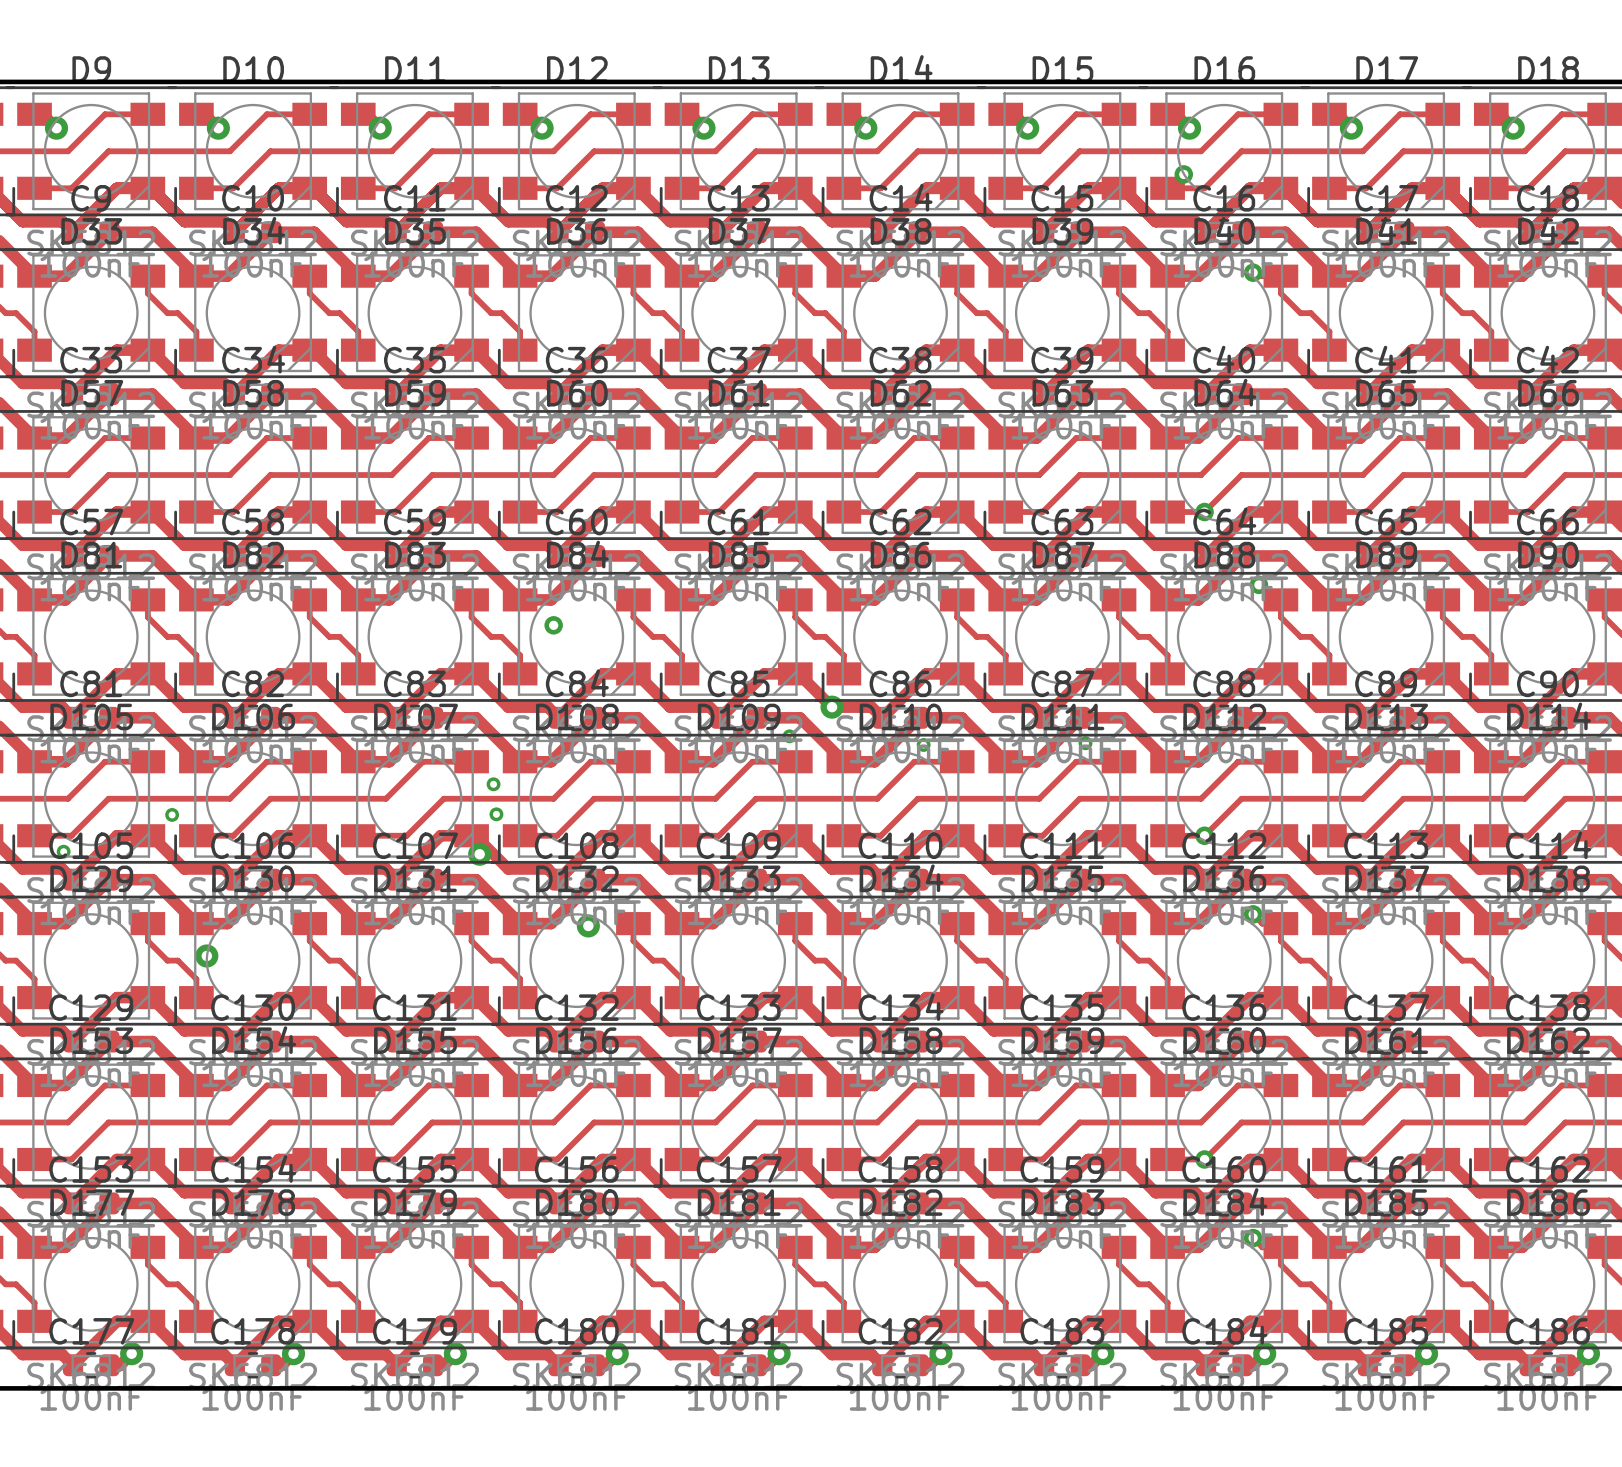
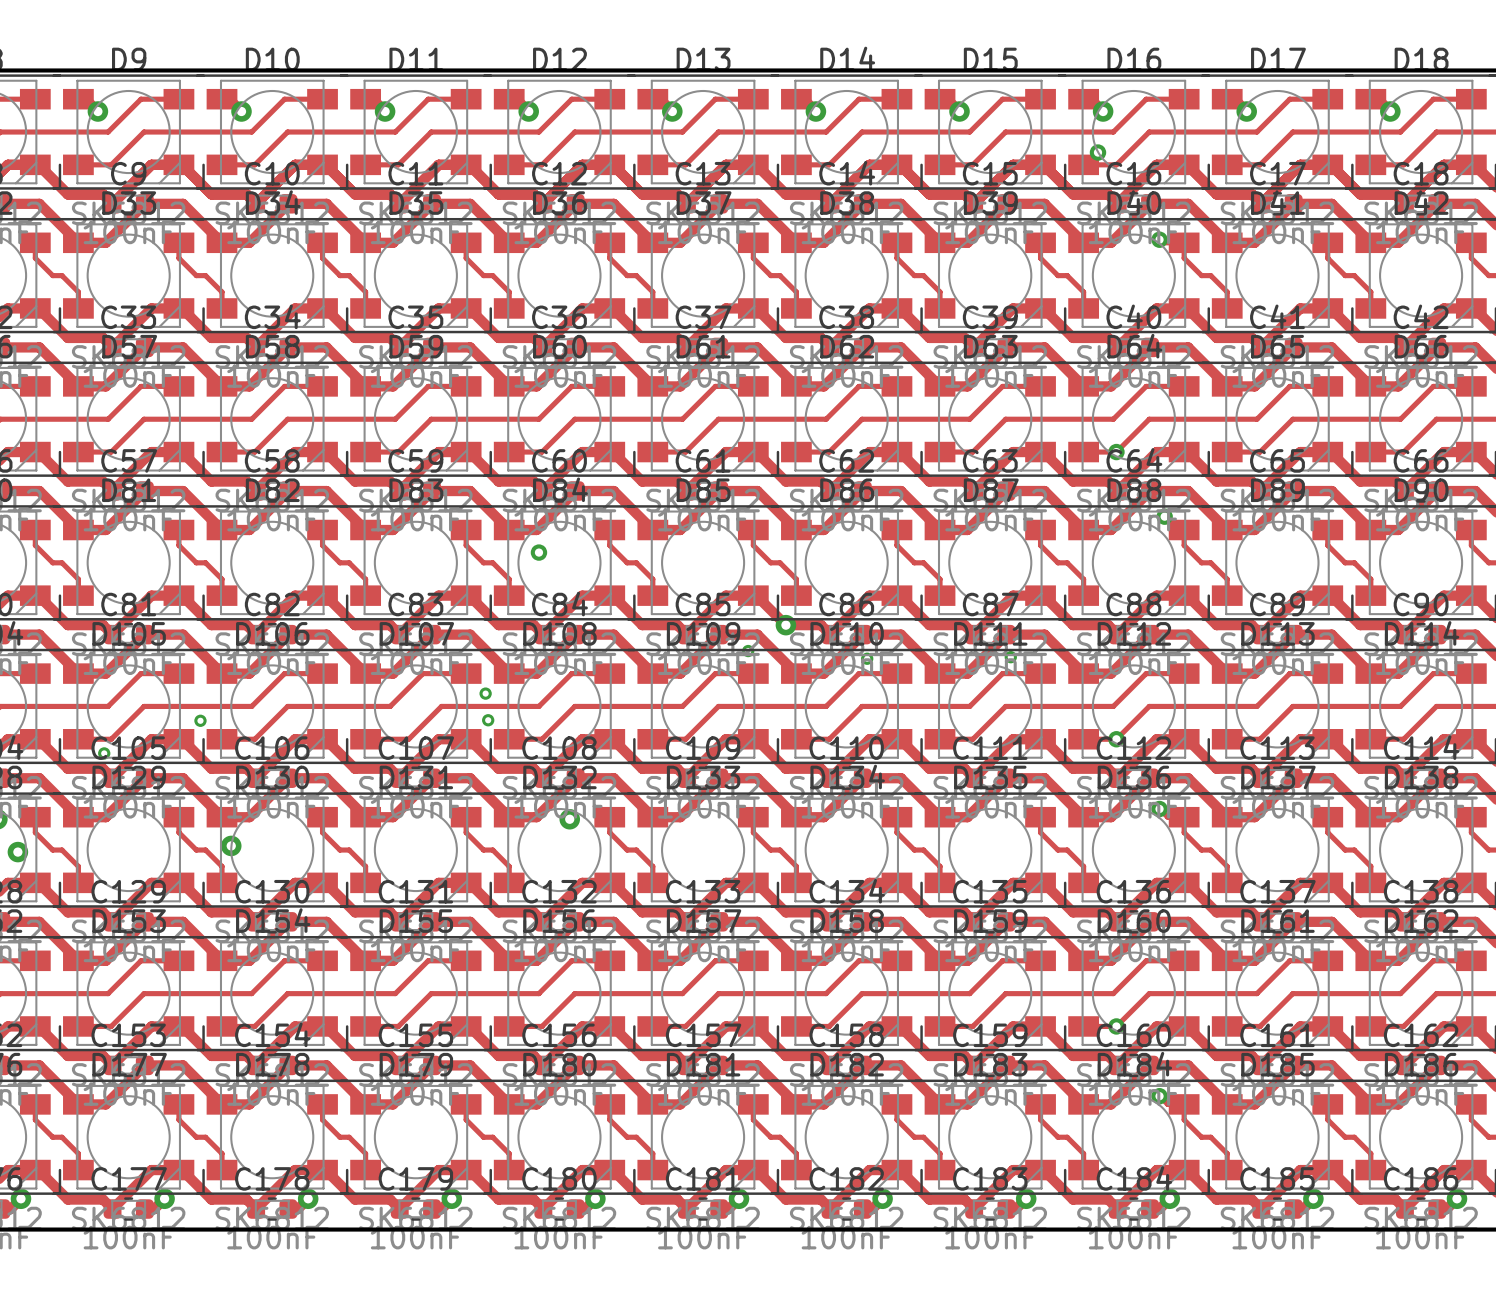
via: (479, 854) -> none

